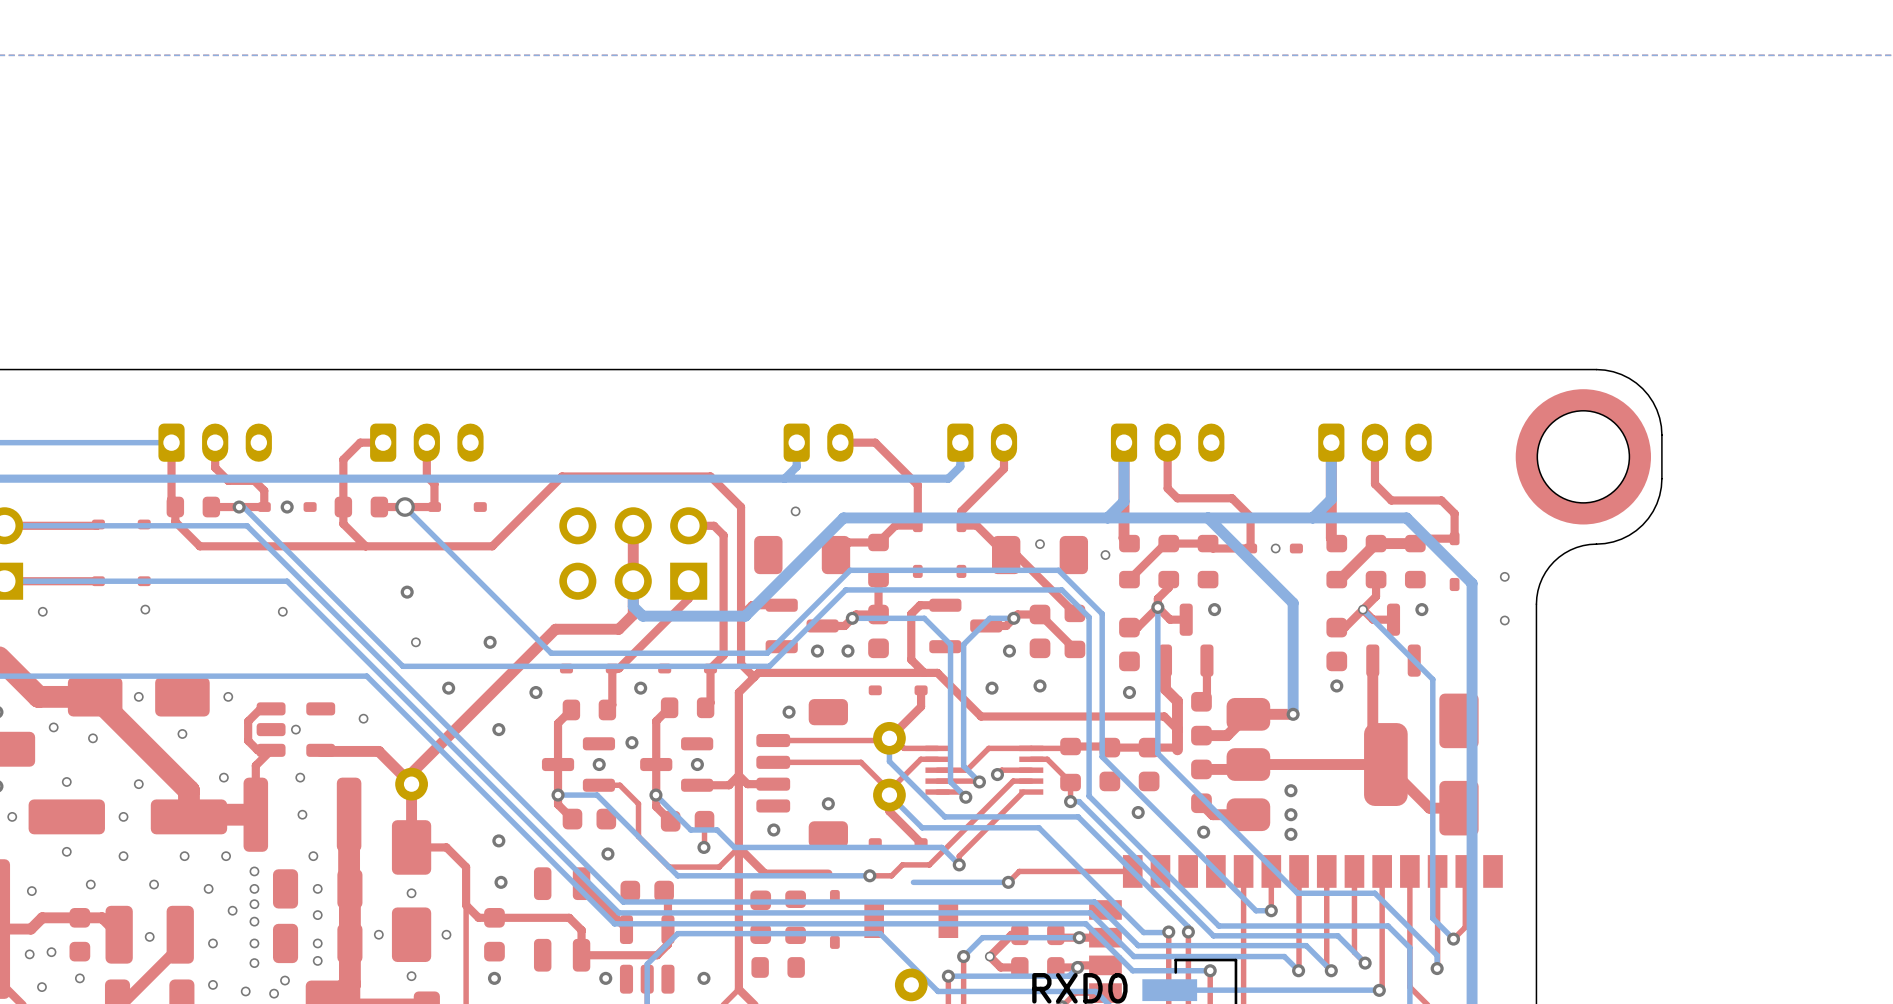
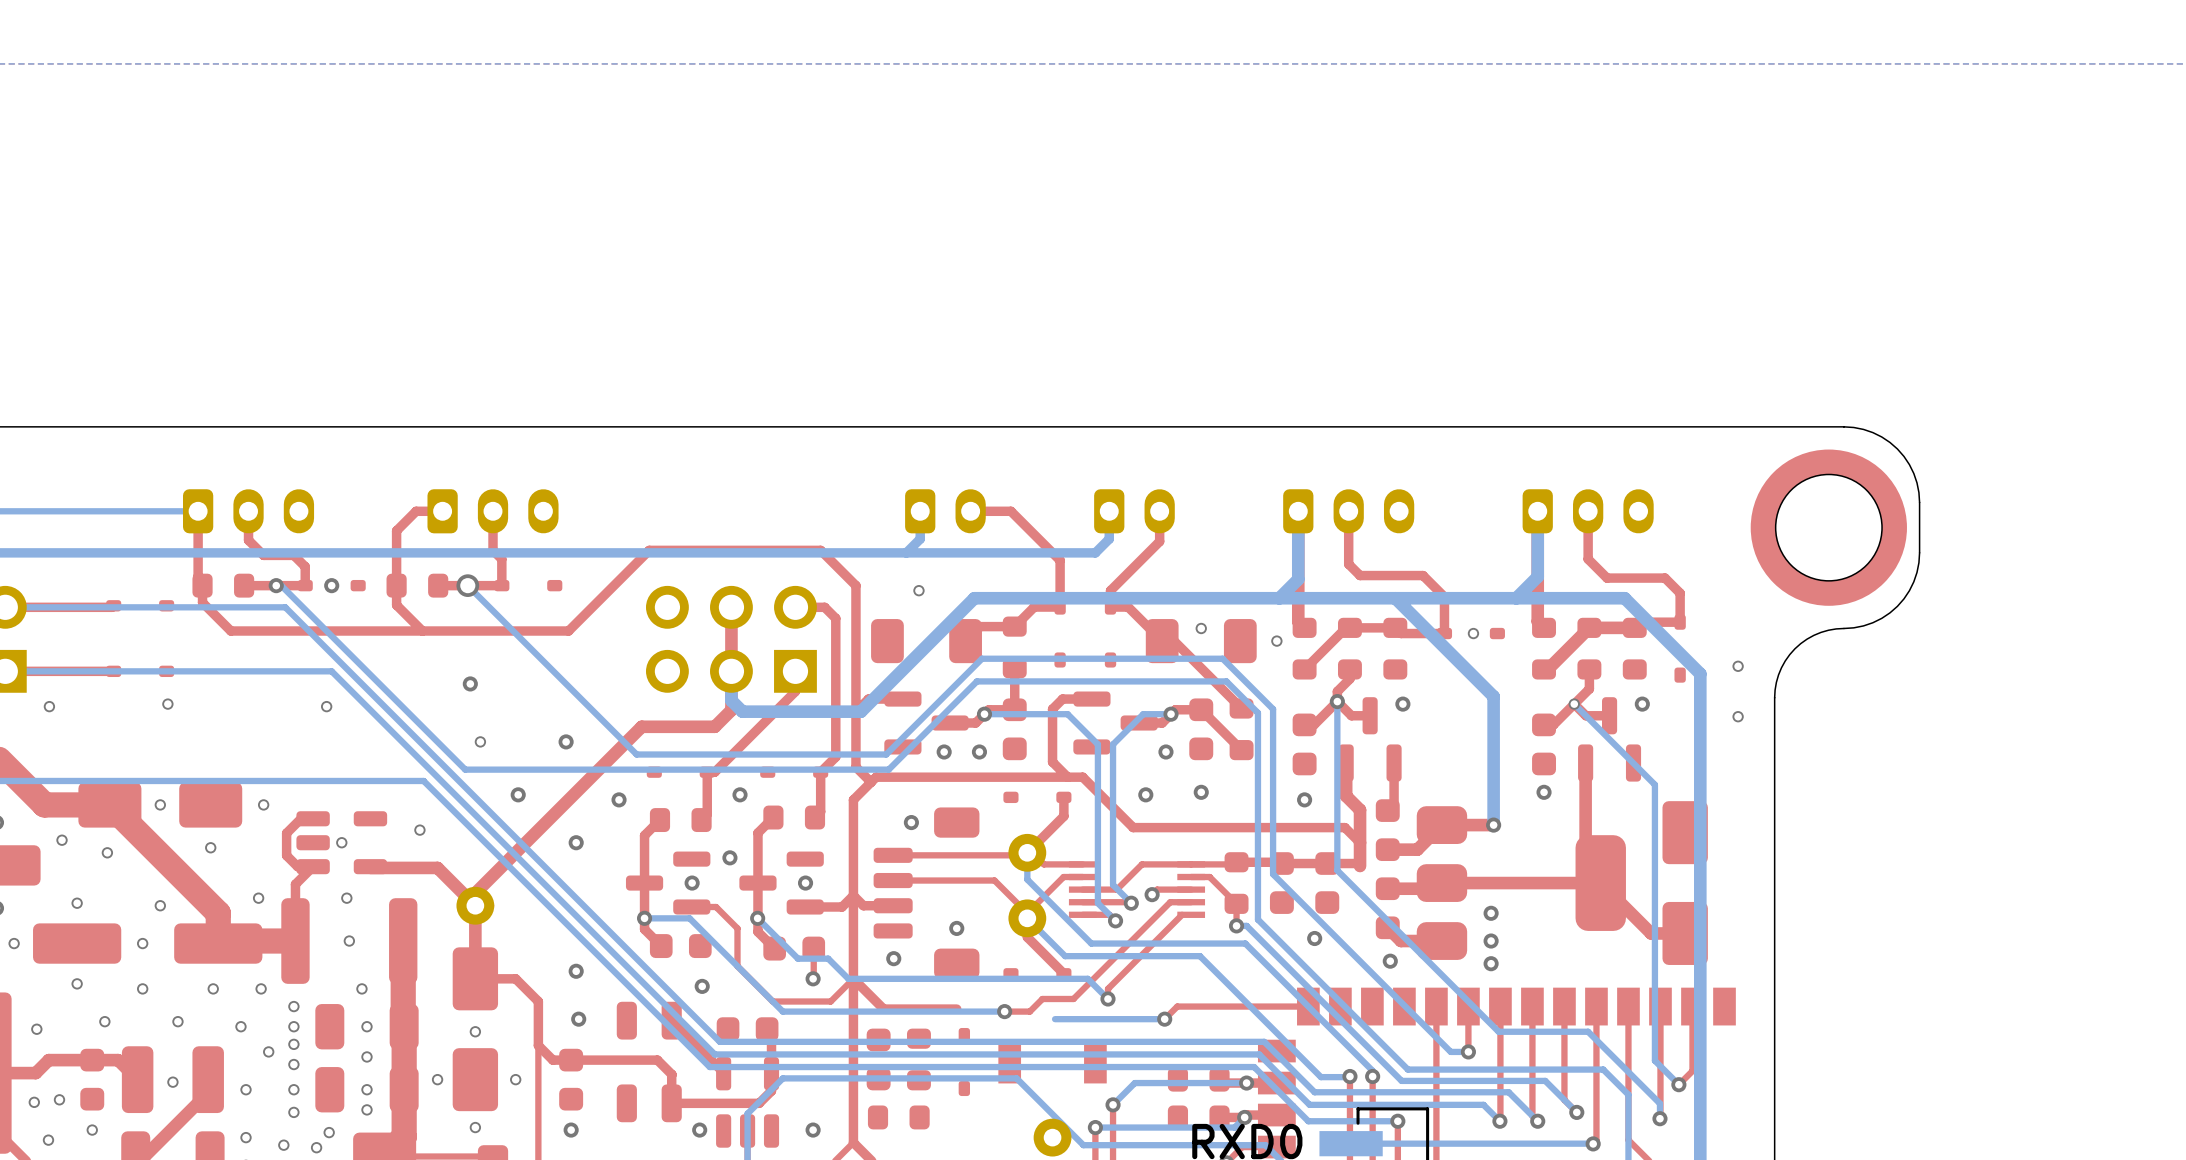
top track: (1019, 934) (1011, 934) (989, 956) (1000, 967) (1019, 967) -> none
via: (989, 956) -> none

